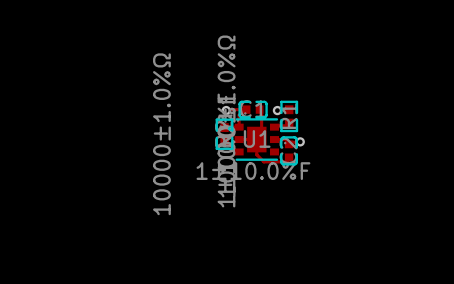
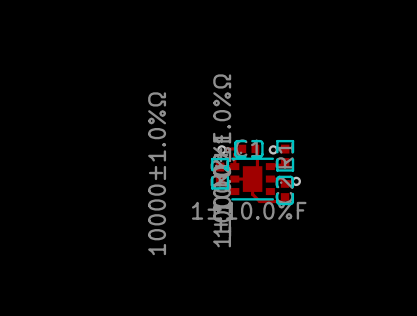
U1 name: U1 (257, 138) -> none

